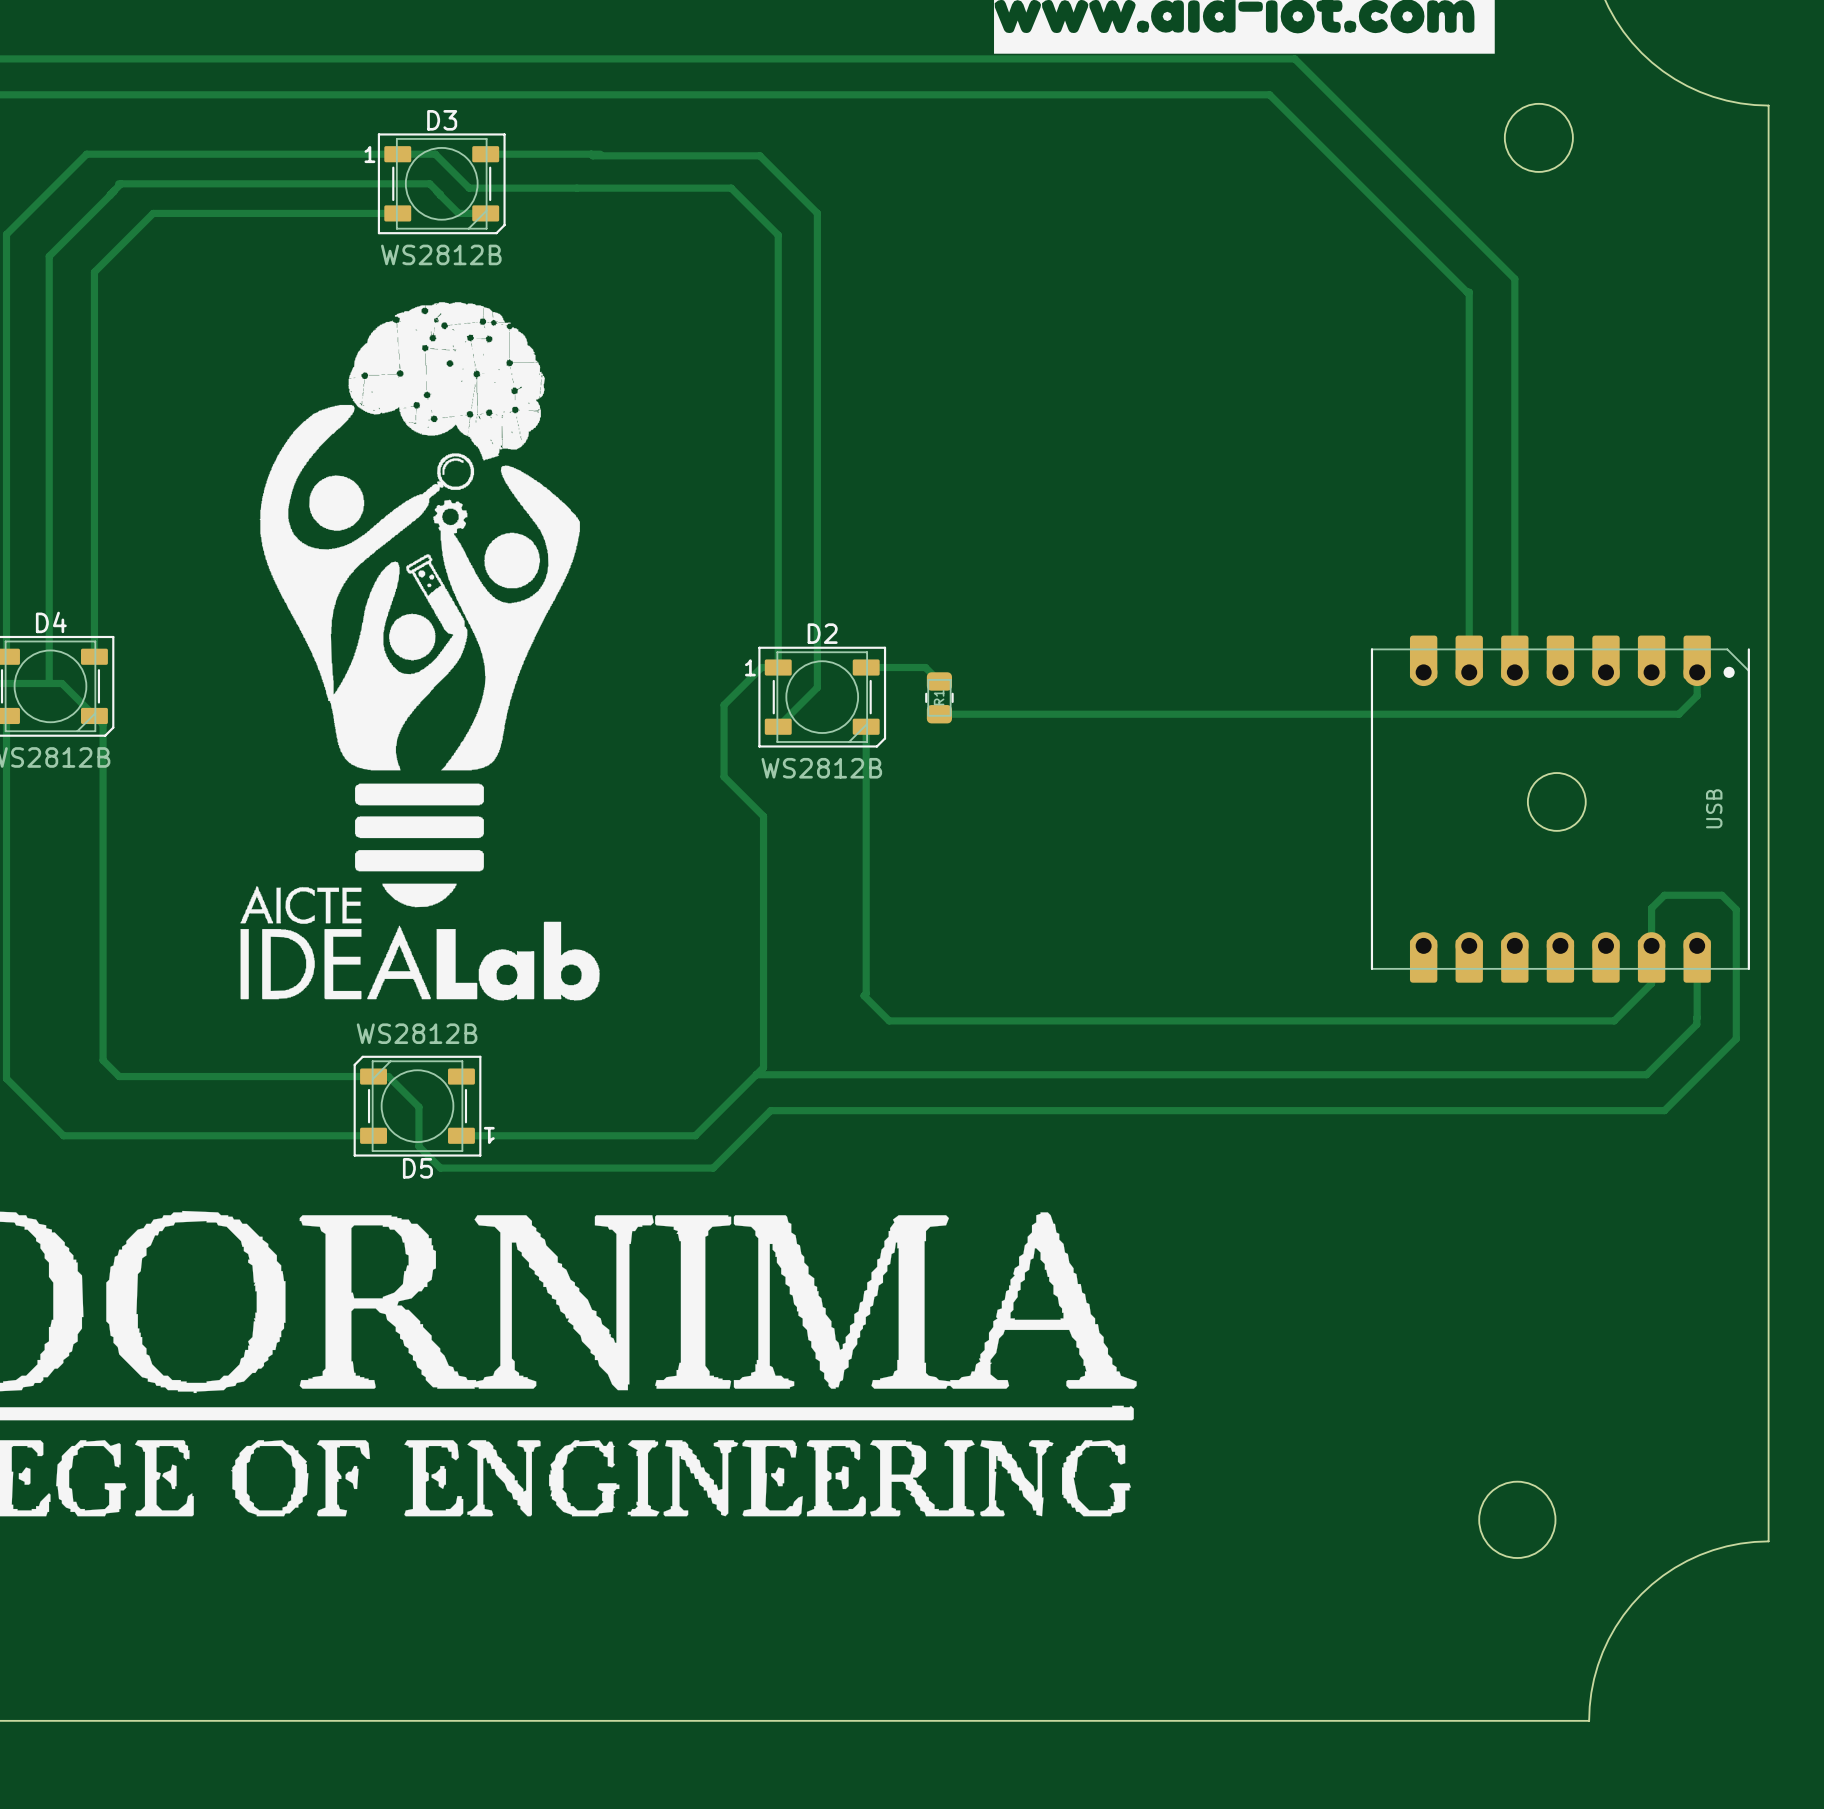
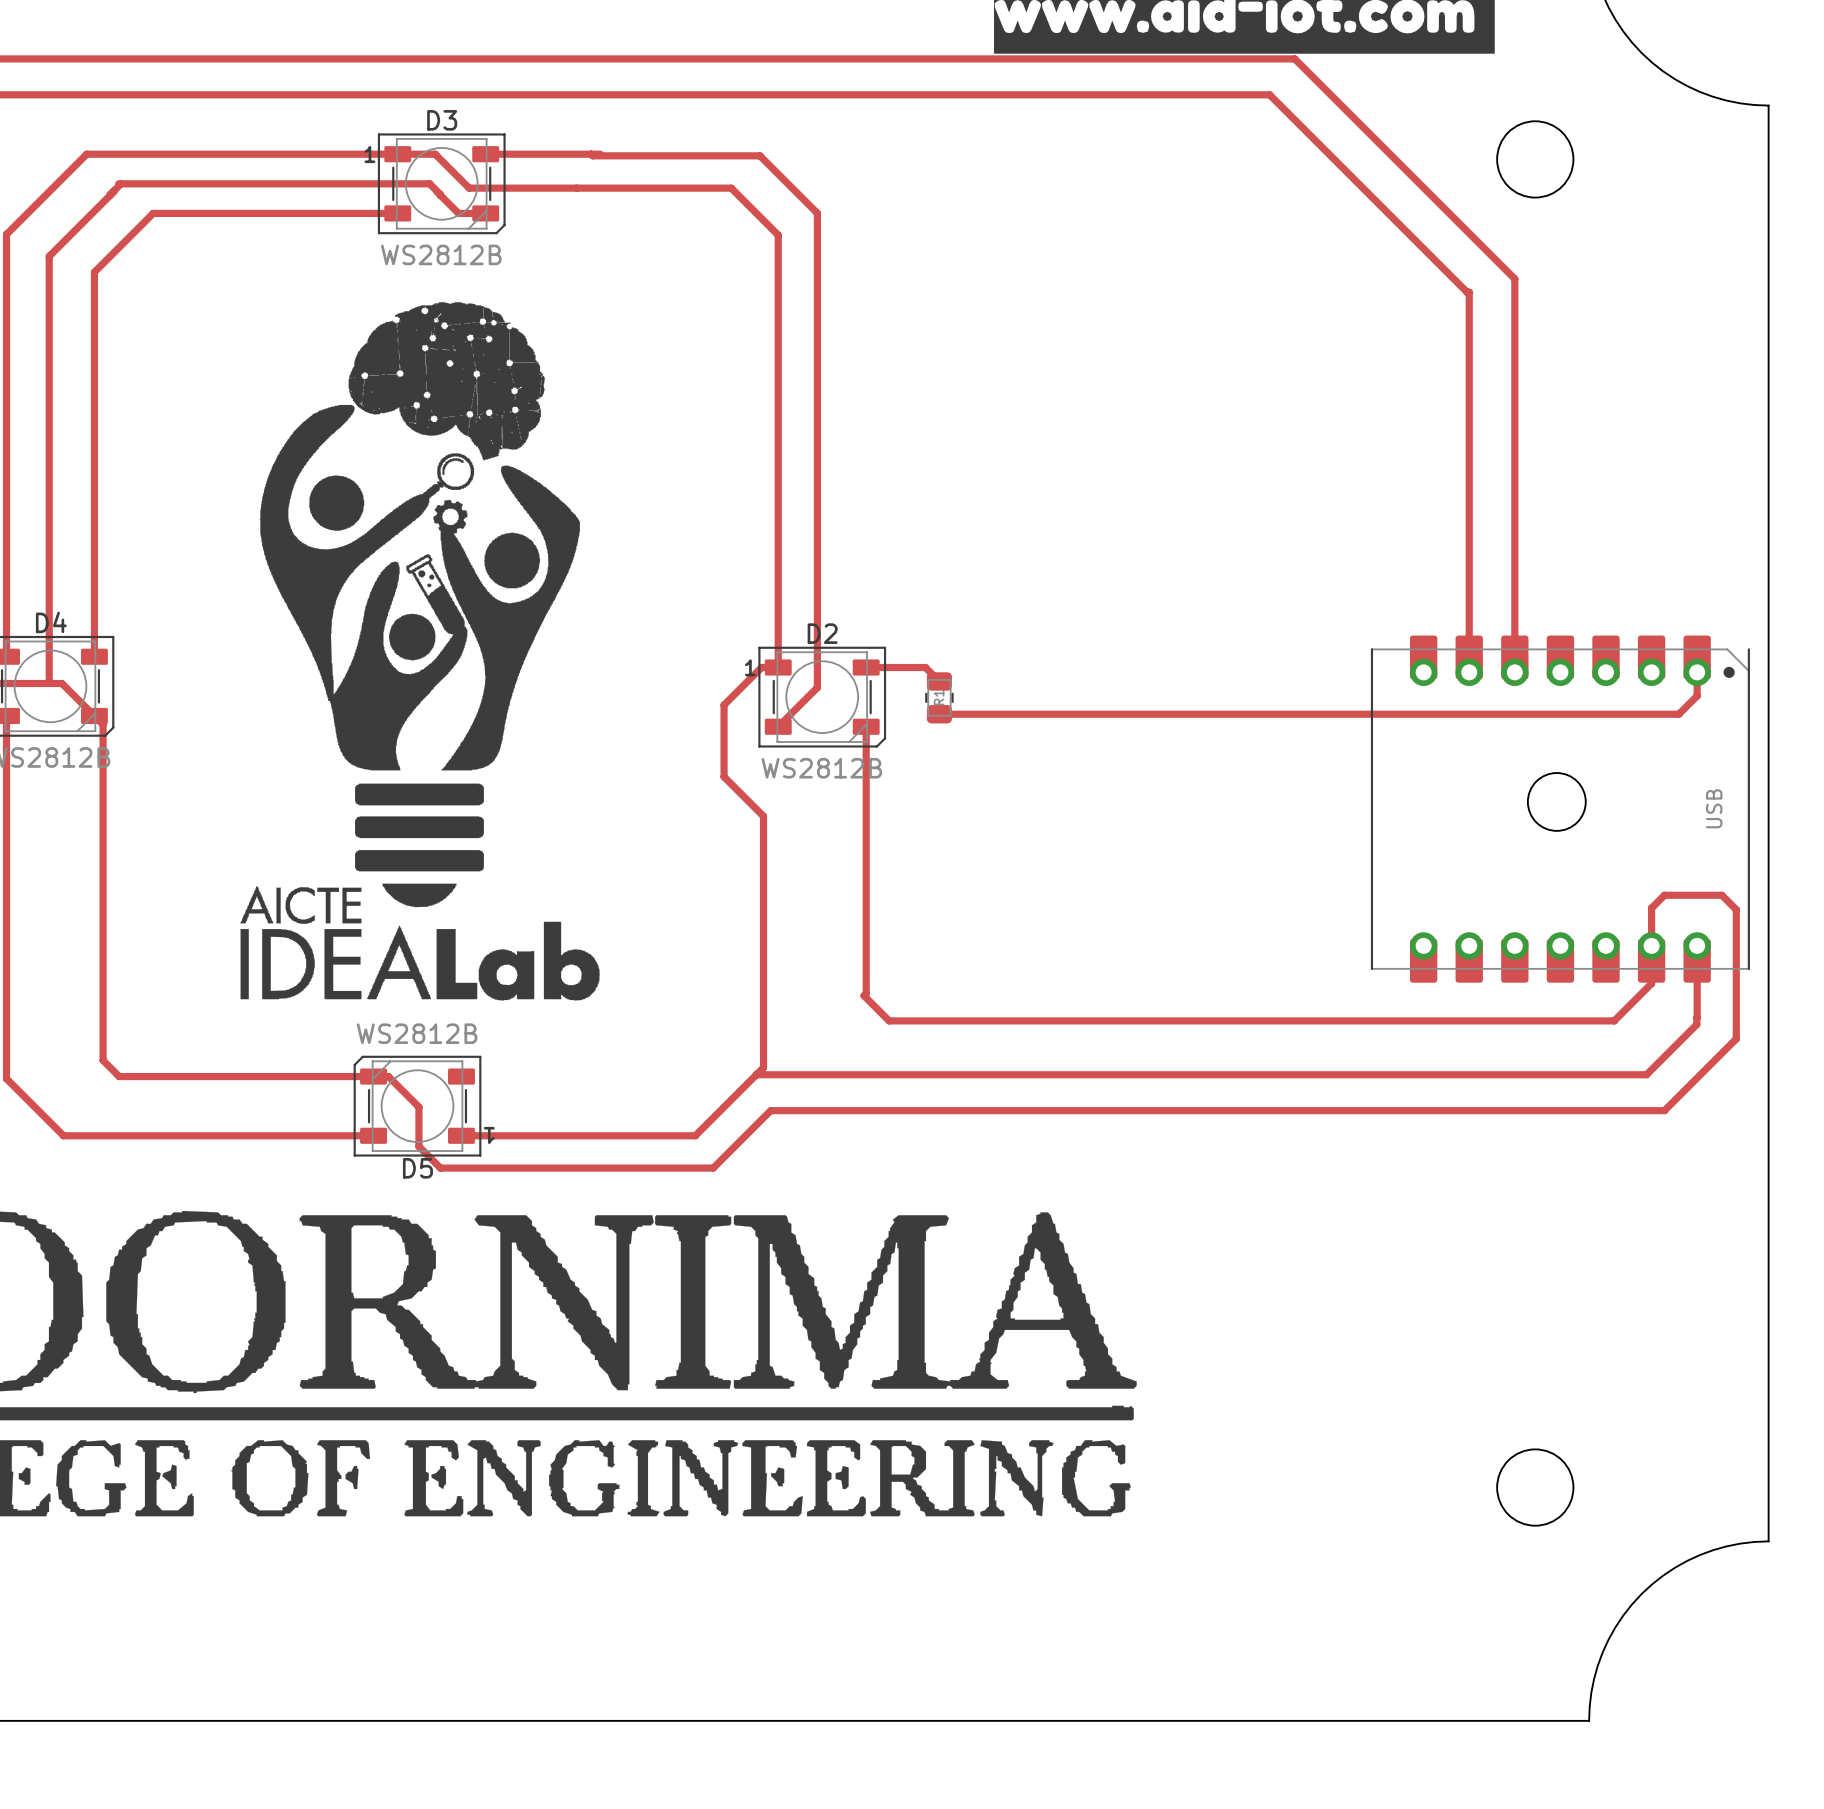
round board edge: [1504, 103, 1574, 173] -> none
round board edge: none -> [1496, 120, 1574, 199]
round board edge position: (1517, 1519) -> (1535, 1487)

